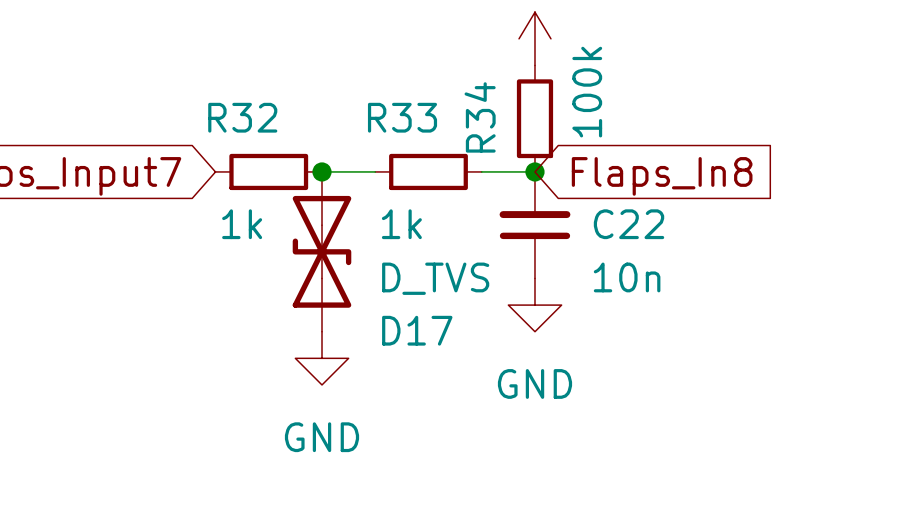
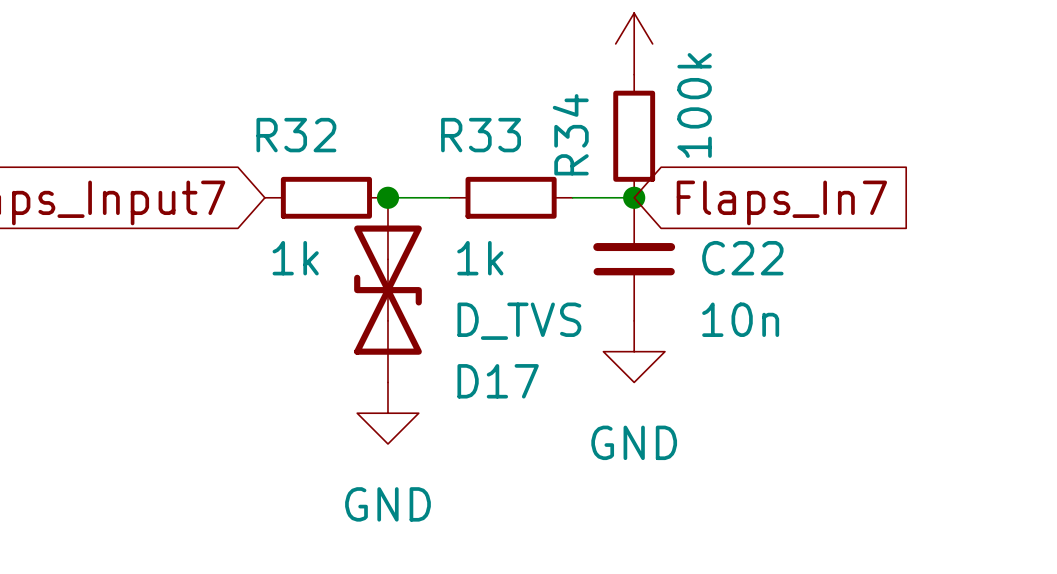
global label: Flaps_In8 (662, 176) -> Flaps_In7 (781, 202)

